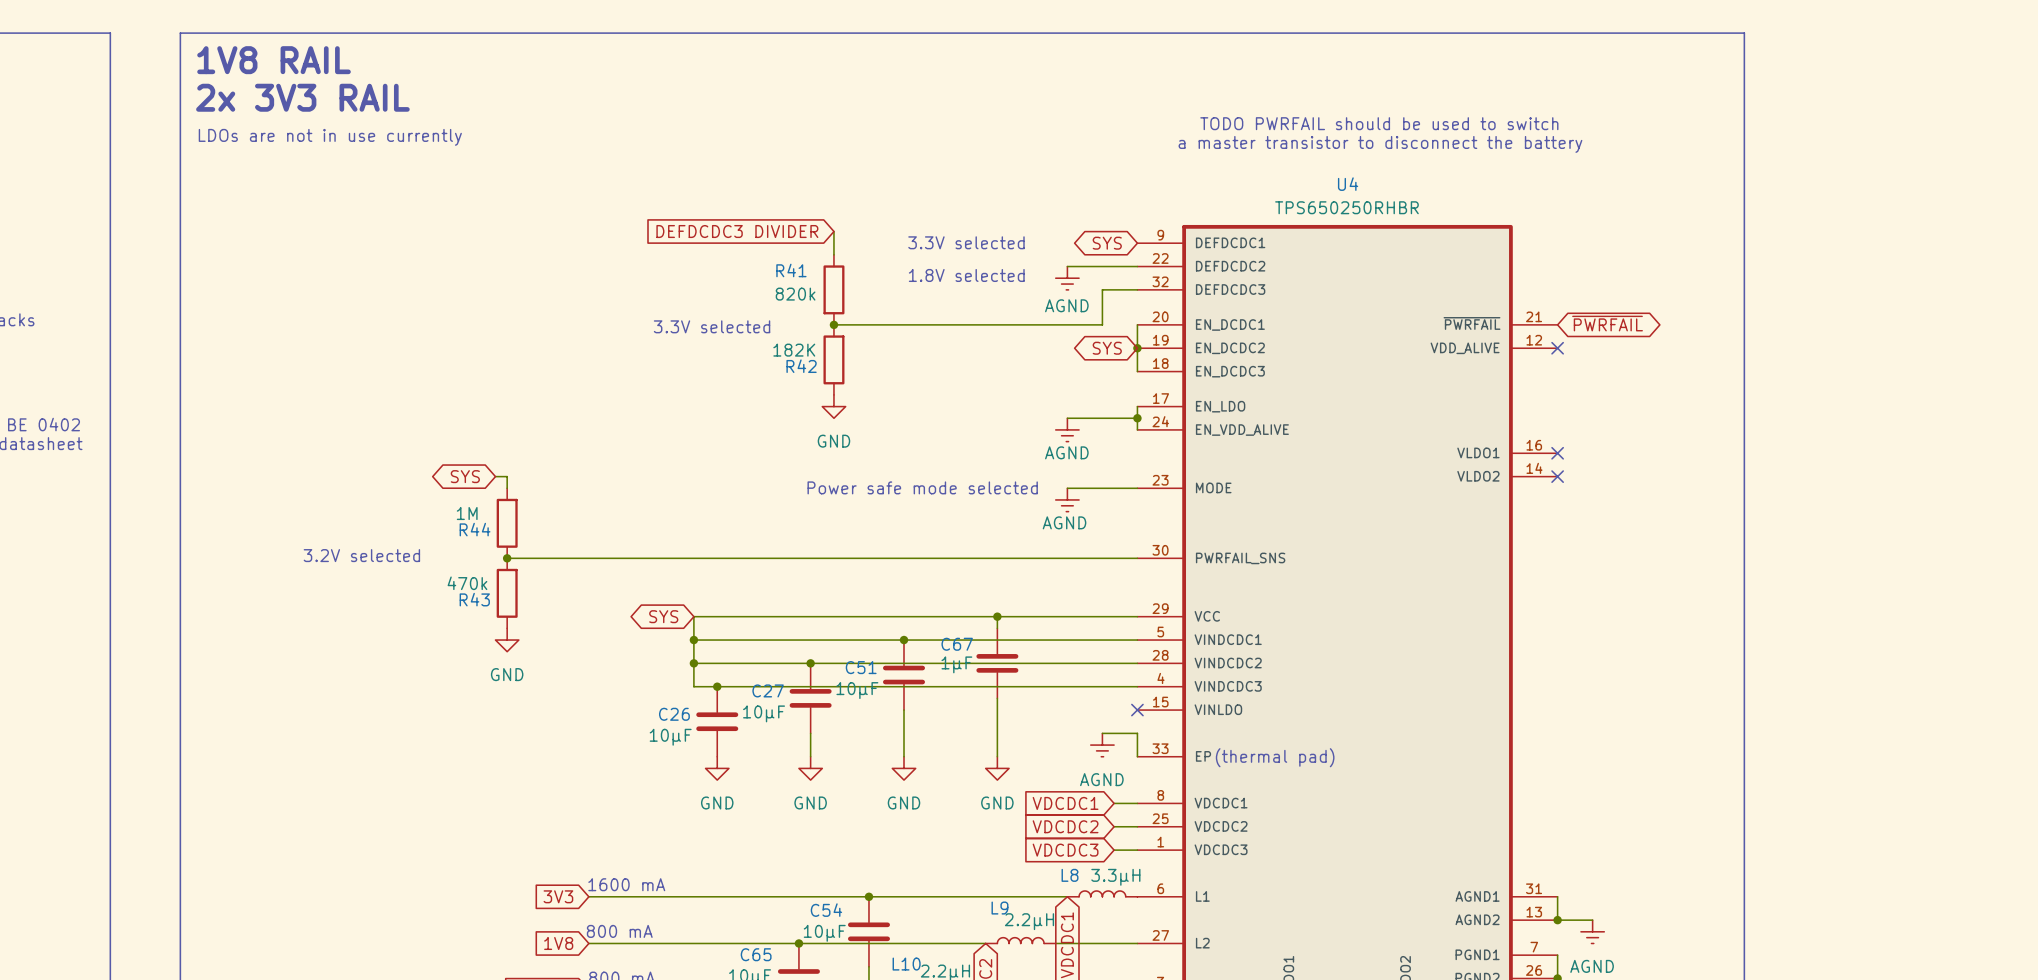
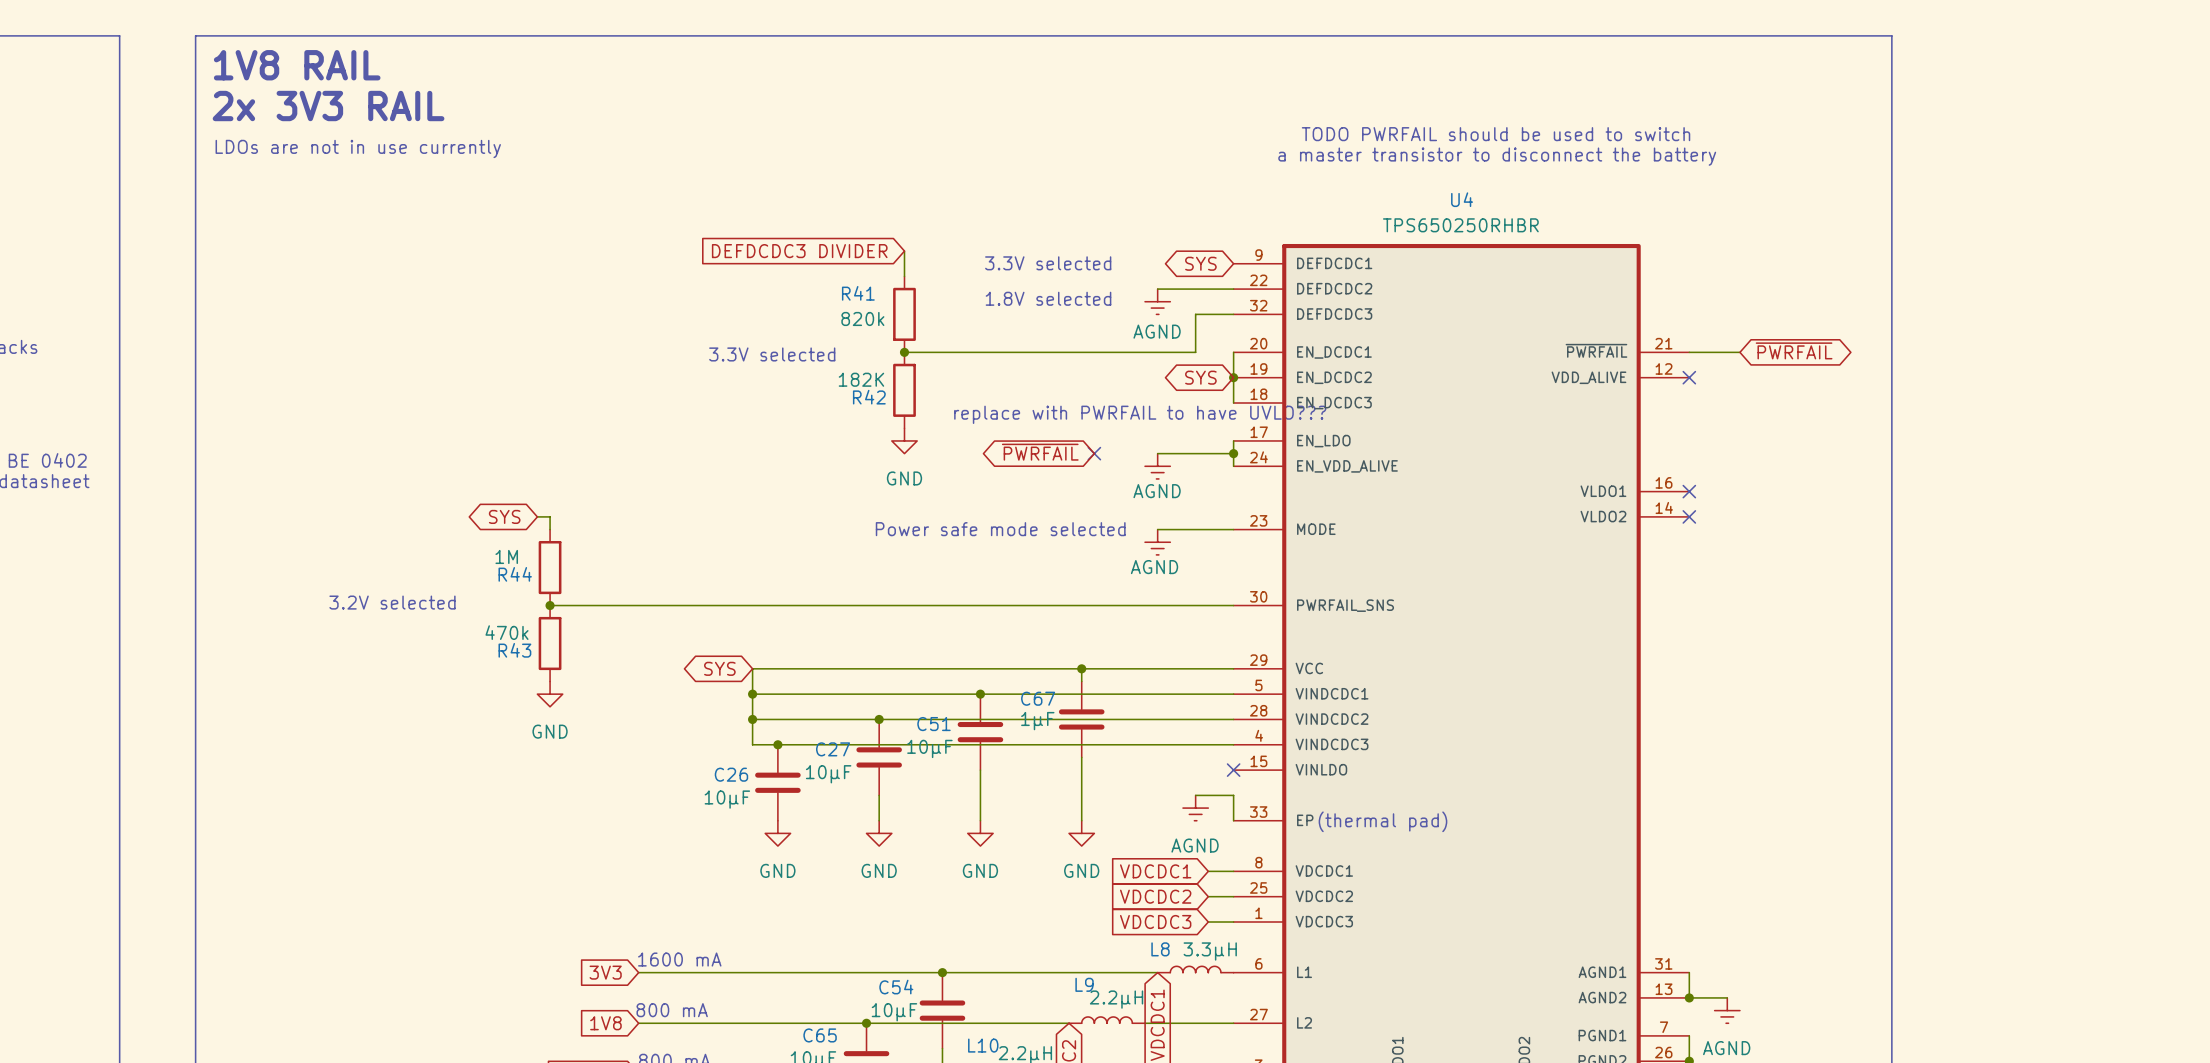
global label position: ~{PWRFAIL} (1607, 323) -> ~{PWRFAIL} (1794, 350)
wire: none -> (1689, 352) (1739, 352)
text: none -> replace with PWRFAIL to have UVLO??? (1140, 414)
global label: none -> ~{PWRFAIL} (1040, 452)
no-connect mark: none -> (1094, 453)

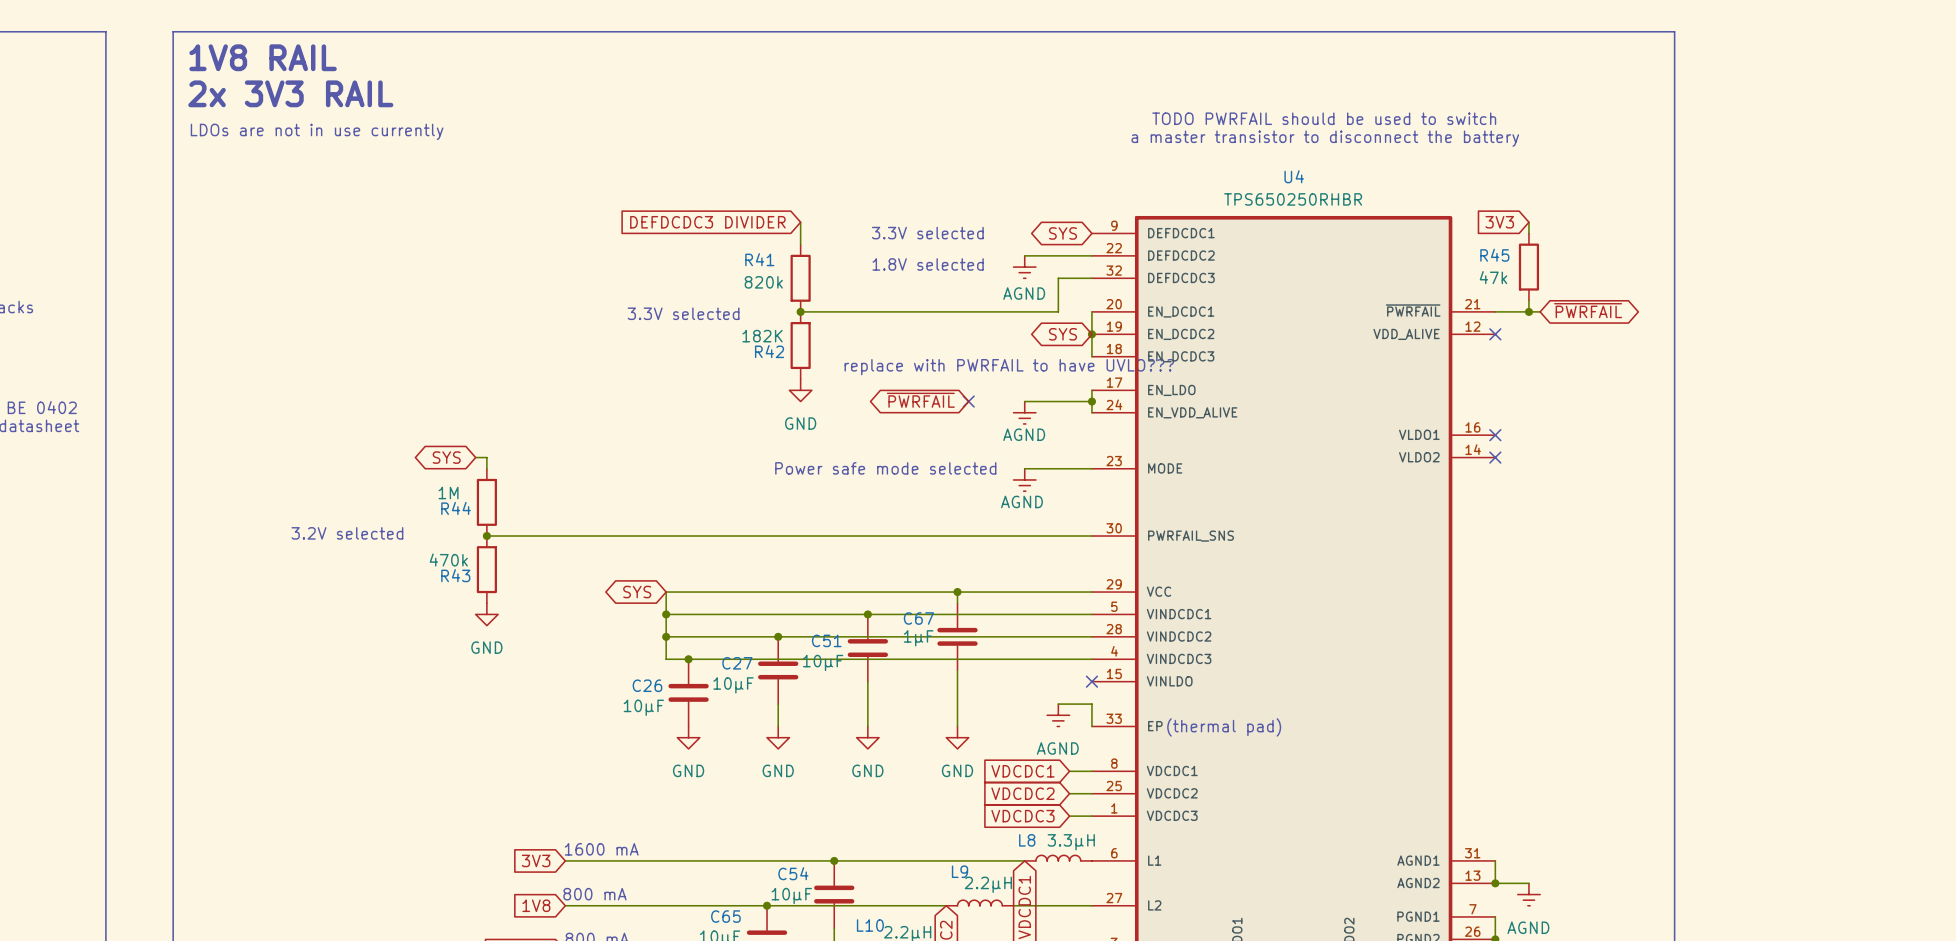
global label: none -> 3V3 (1499, 222)
wire: none -> (1528, 222) (1528, 233)
R45: none -> 47k (1528, 267)
wire: none -> (1528, 300) (1528, 311)
junction: none -> (1528, 311)

